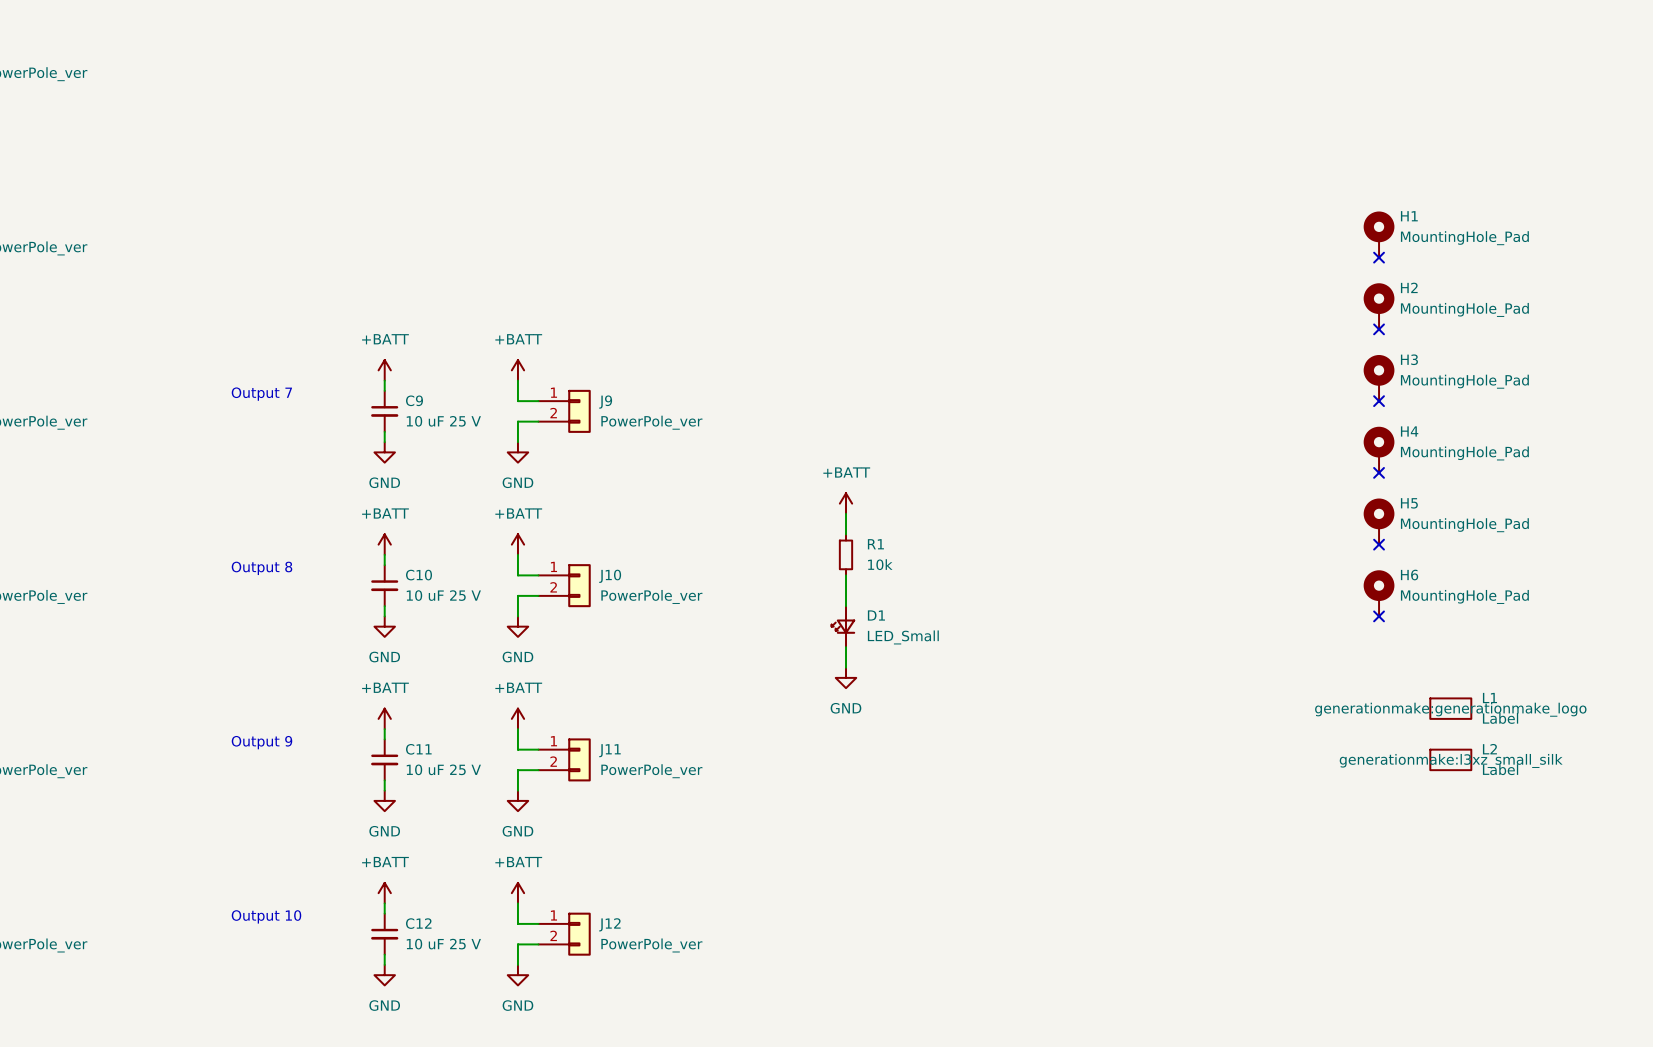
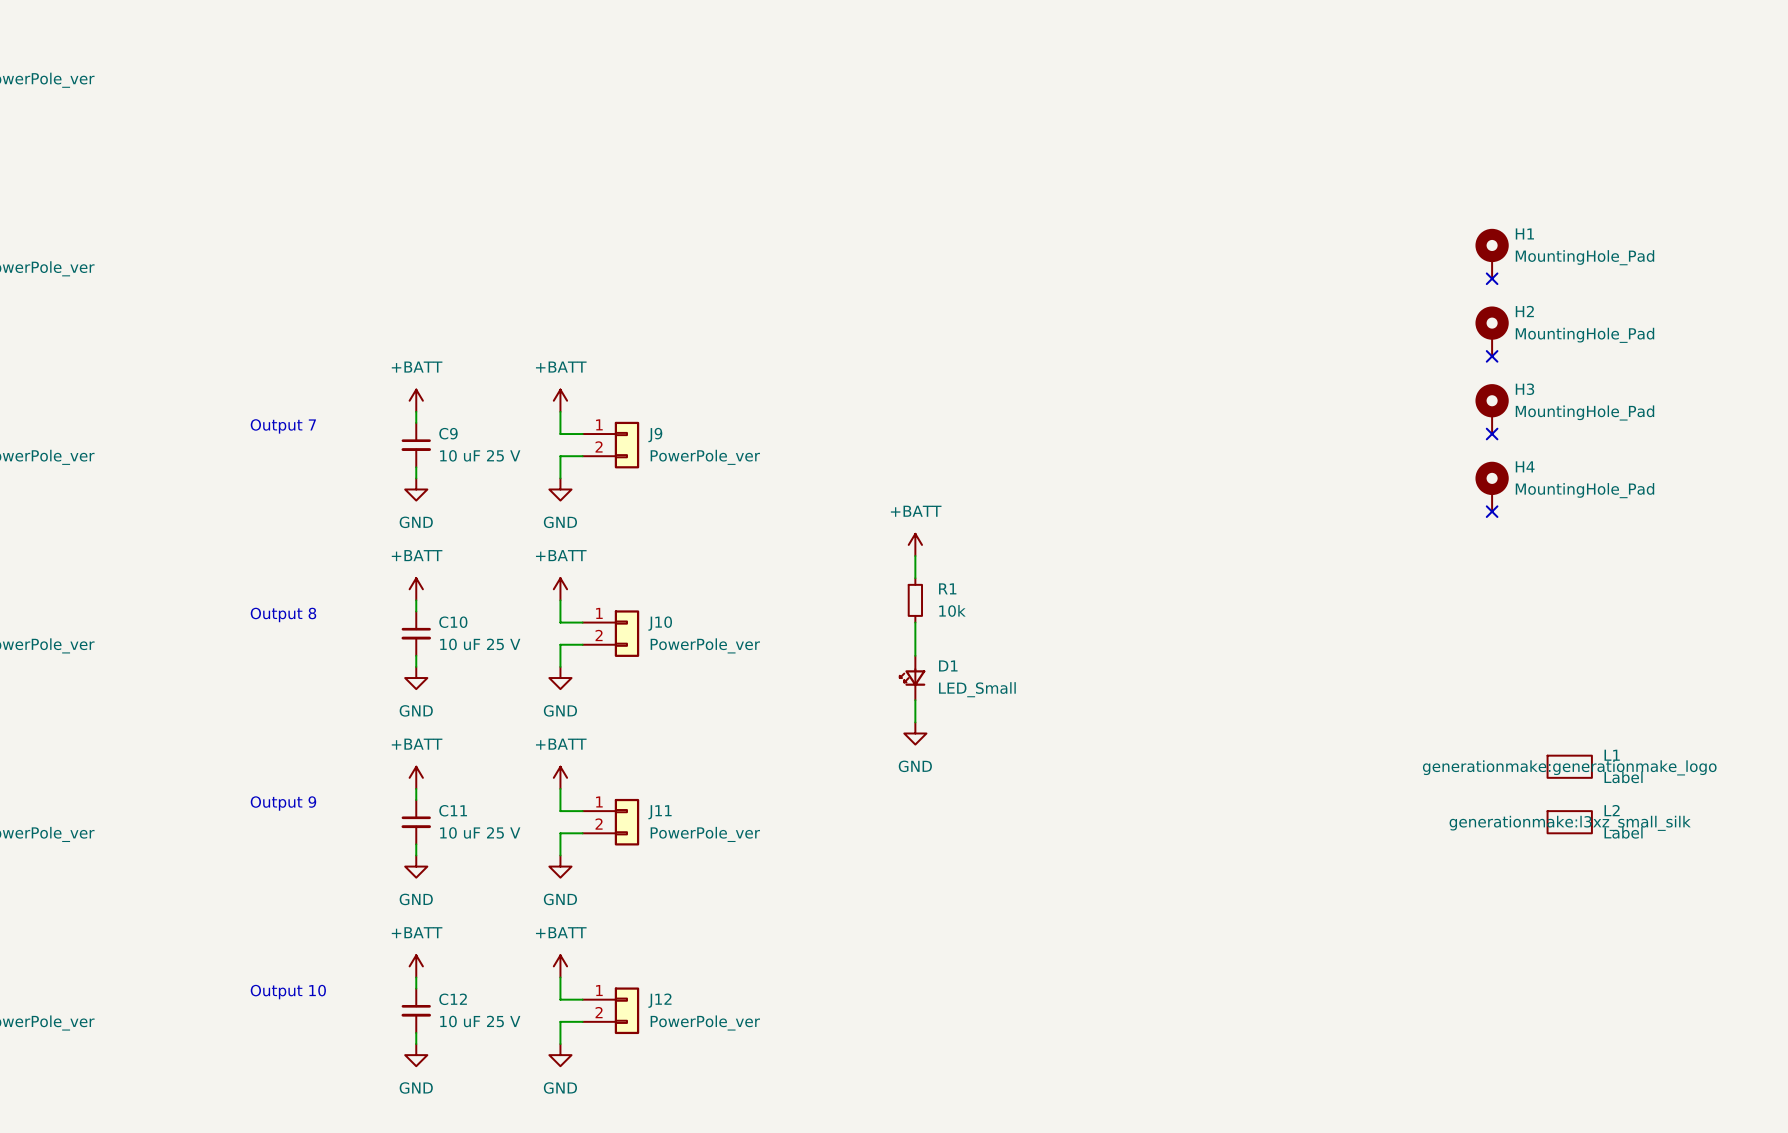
H5: MountingHole_Pad (1379, 521) -> none
no-connect mark: (1379, 544) -> none
H6: MountingHole_Pad (1379, 593) -> none
no-connect mark: (1379, 616) -> none

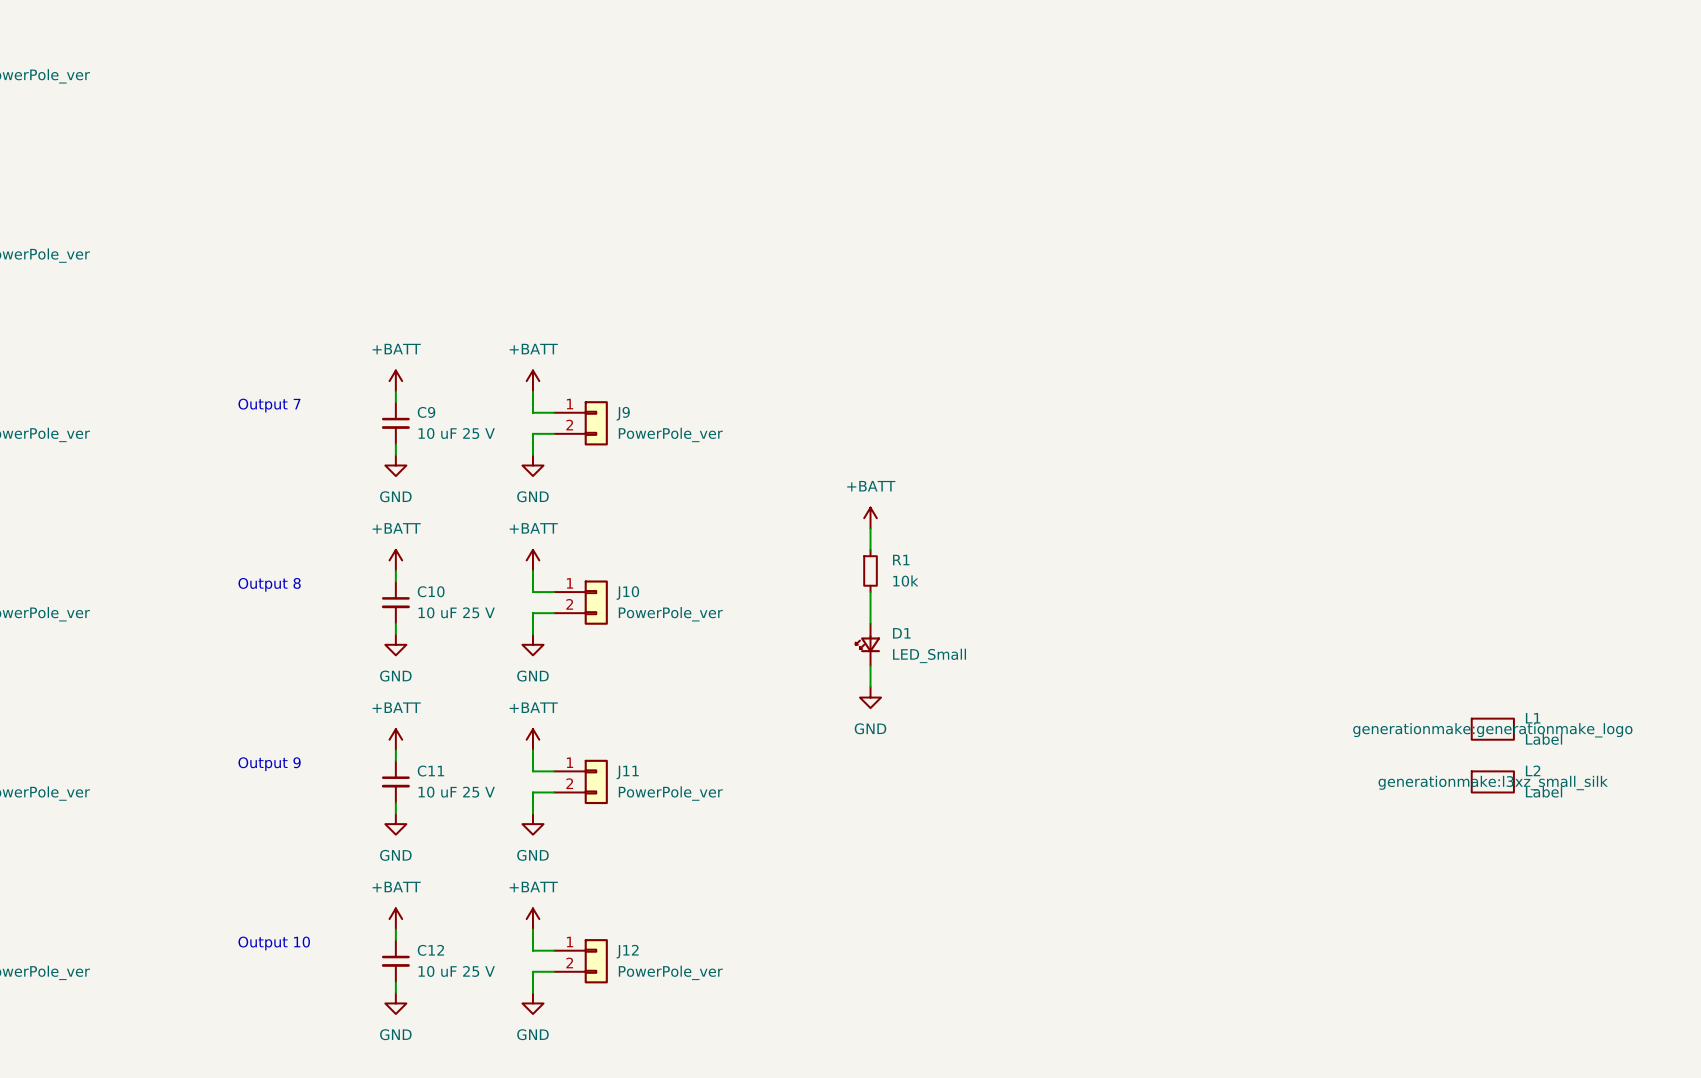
H1: MountingHole_Pad (1492, 253) -> none
no-connect mark: (1492, 278) -> none
H2: MountingHole_Pad (1492, 331) -> none
no-connect mark: (1492, 356) -> none
H3: MountingHole_Pad (1492, 409) -> none
no-connect mark: (1492, 434) -> none
H4: MountingHole_Pad (1492, 486) -> none
no-connect mark: (1492, 511) -> none

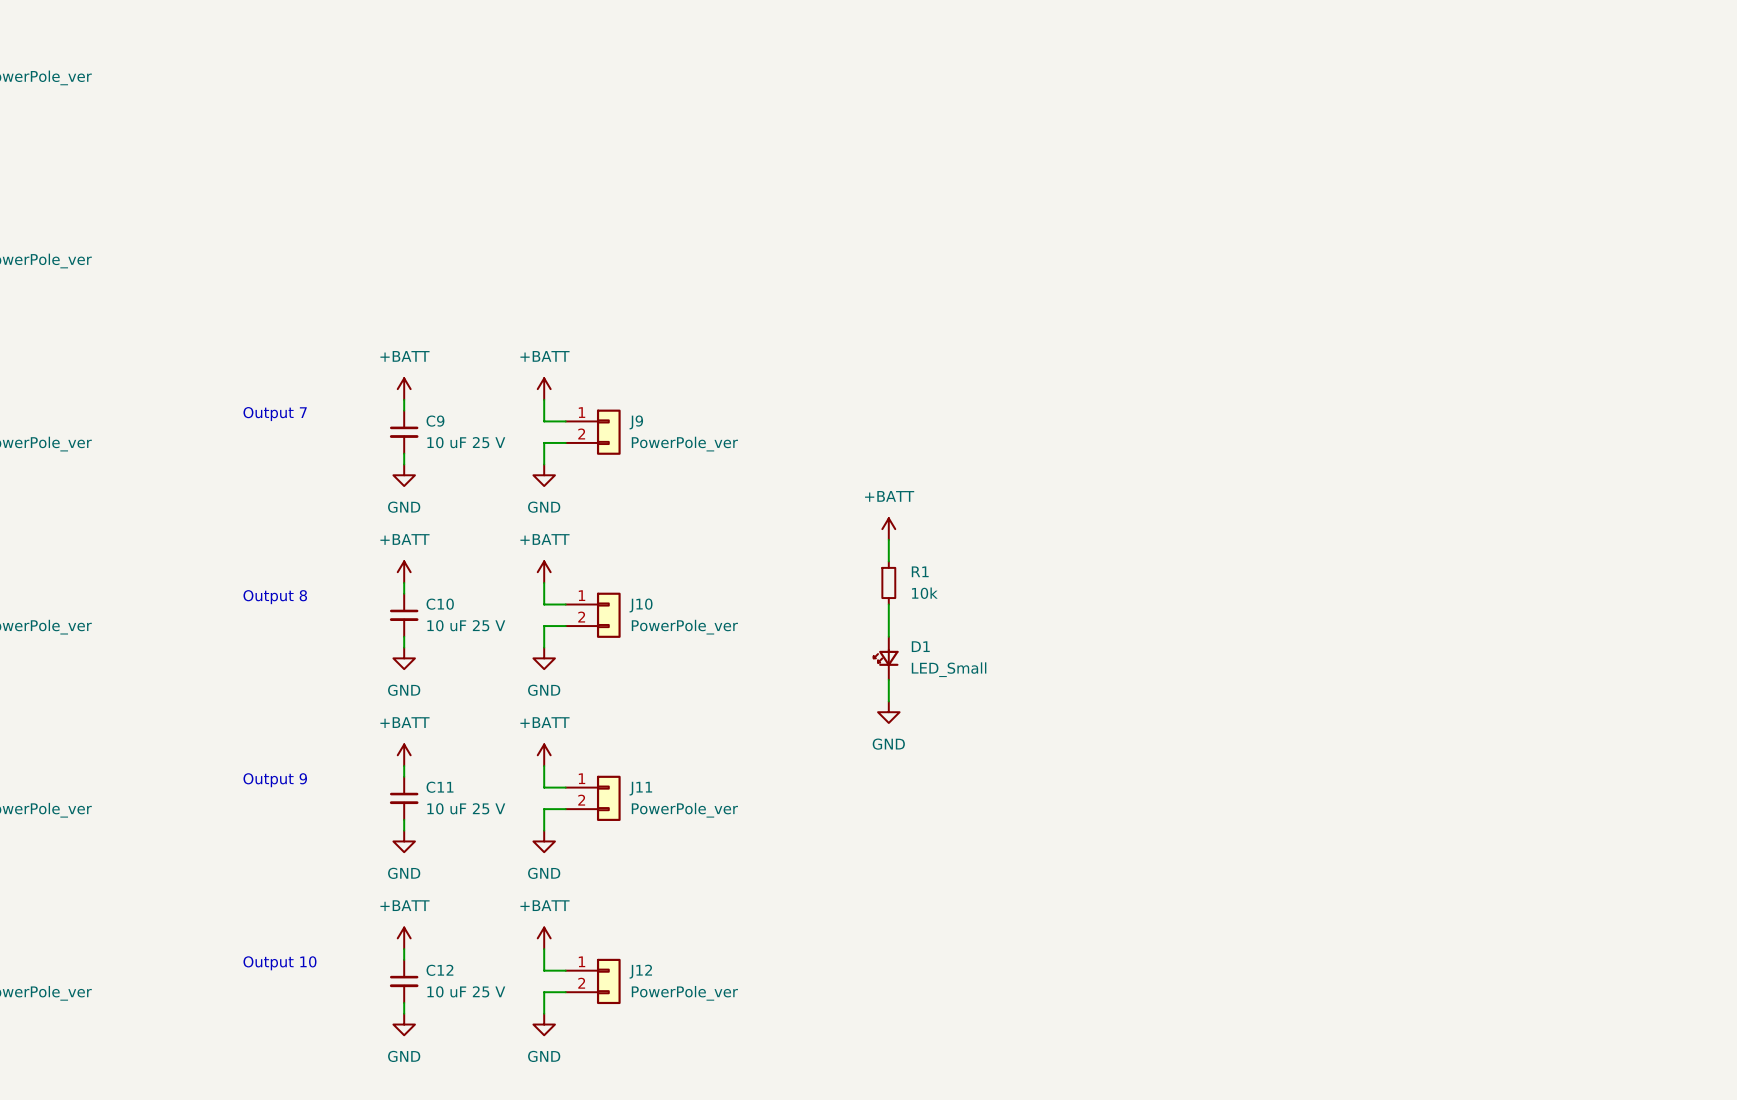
L1: Label (1492, 729) -> none
L2: Label (1492, 781) -> none

